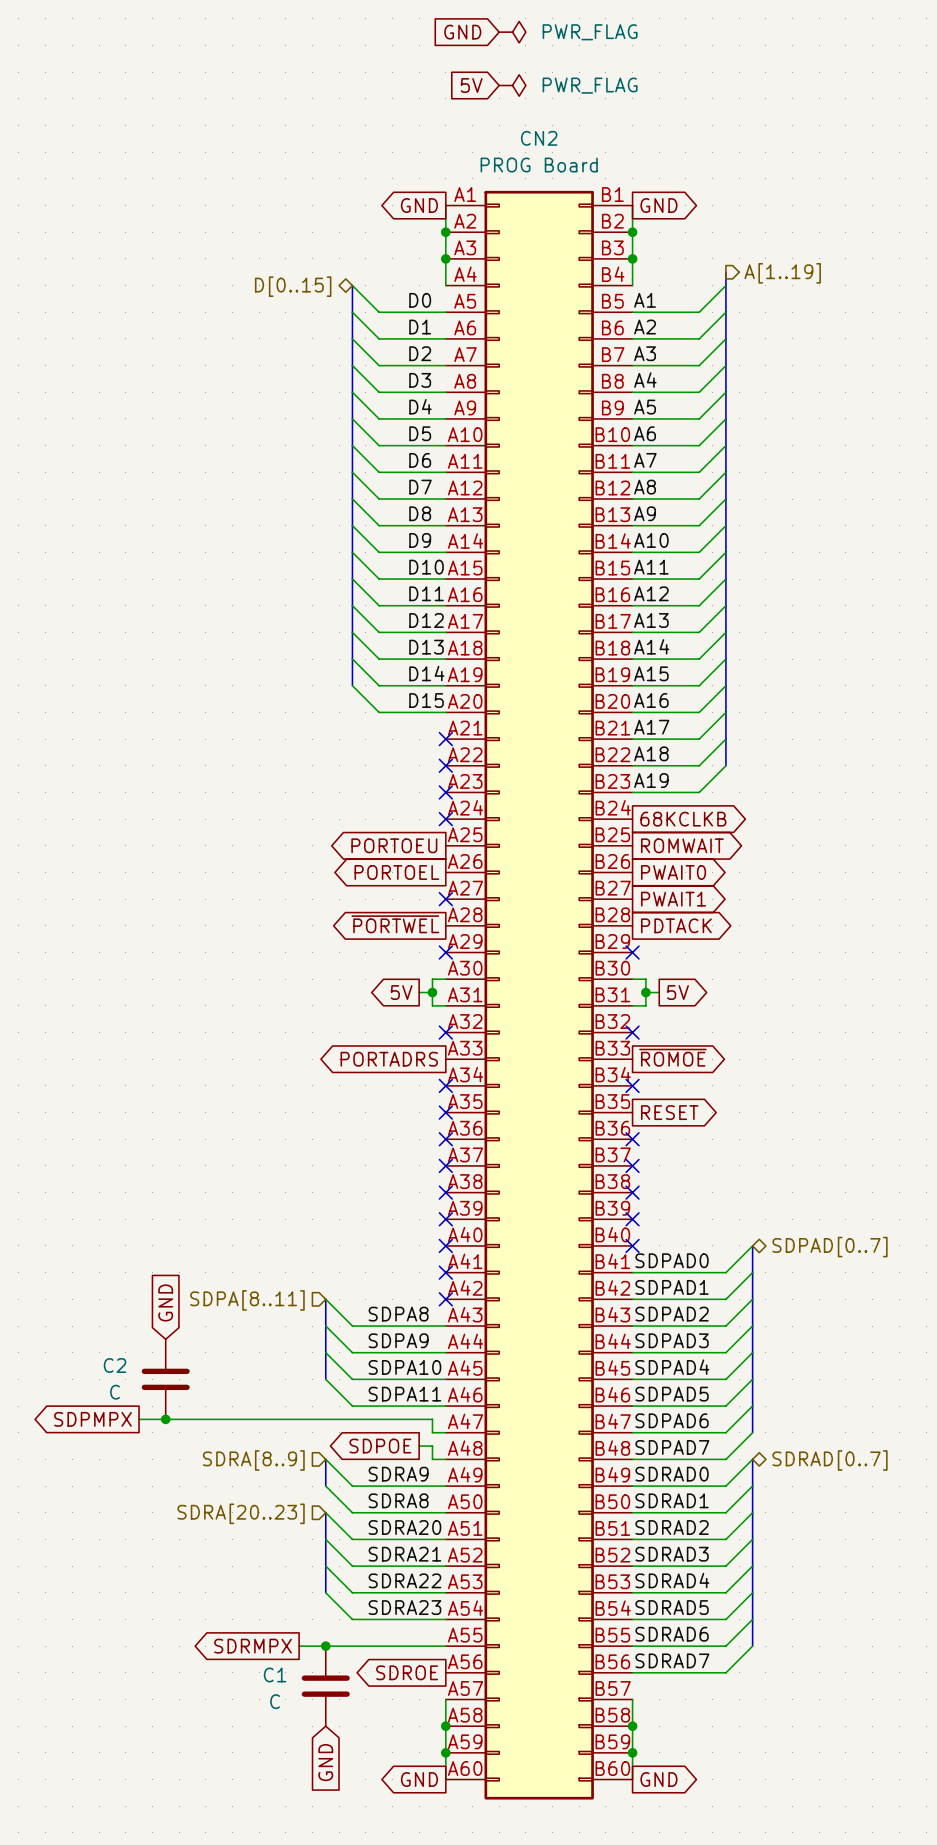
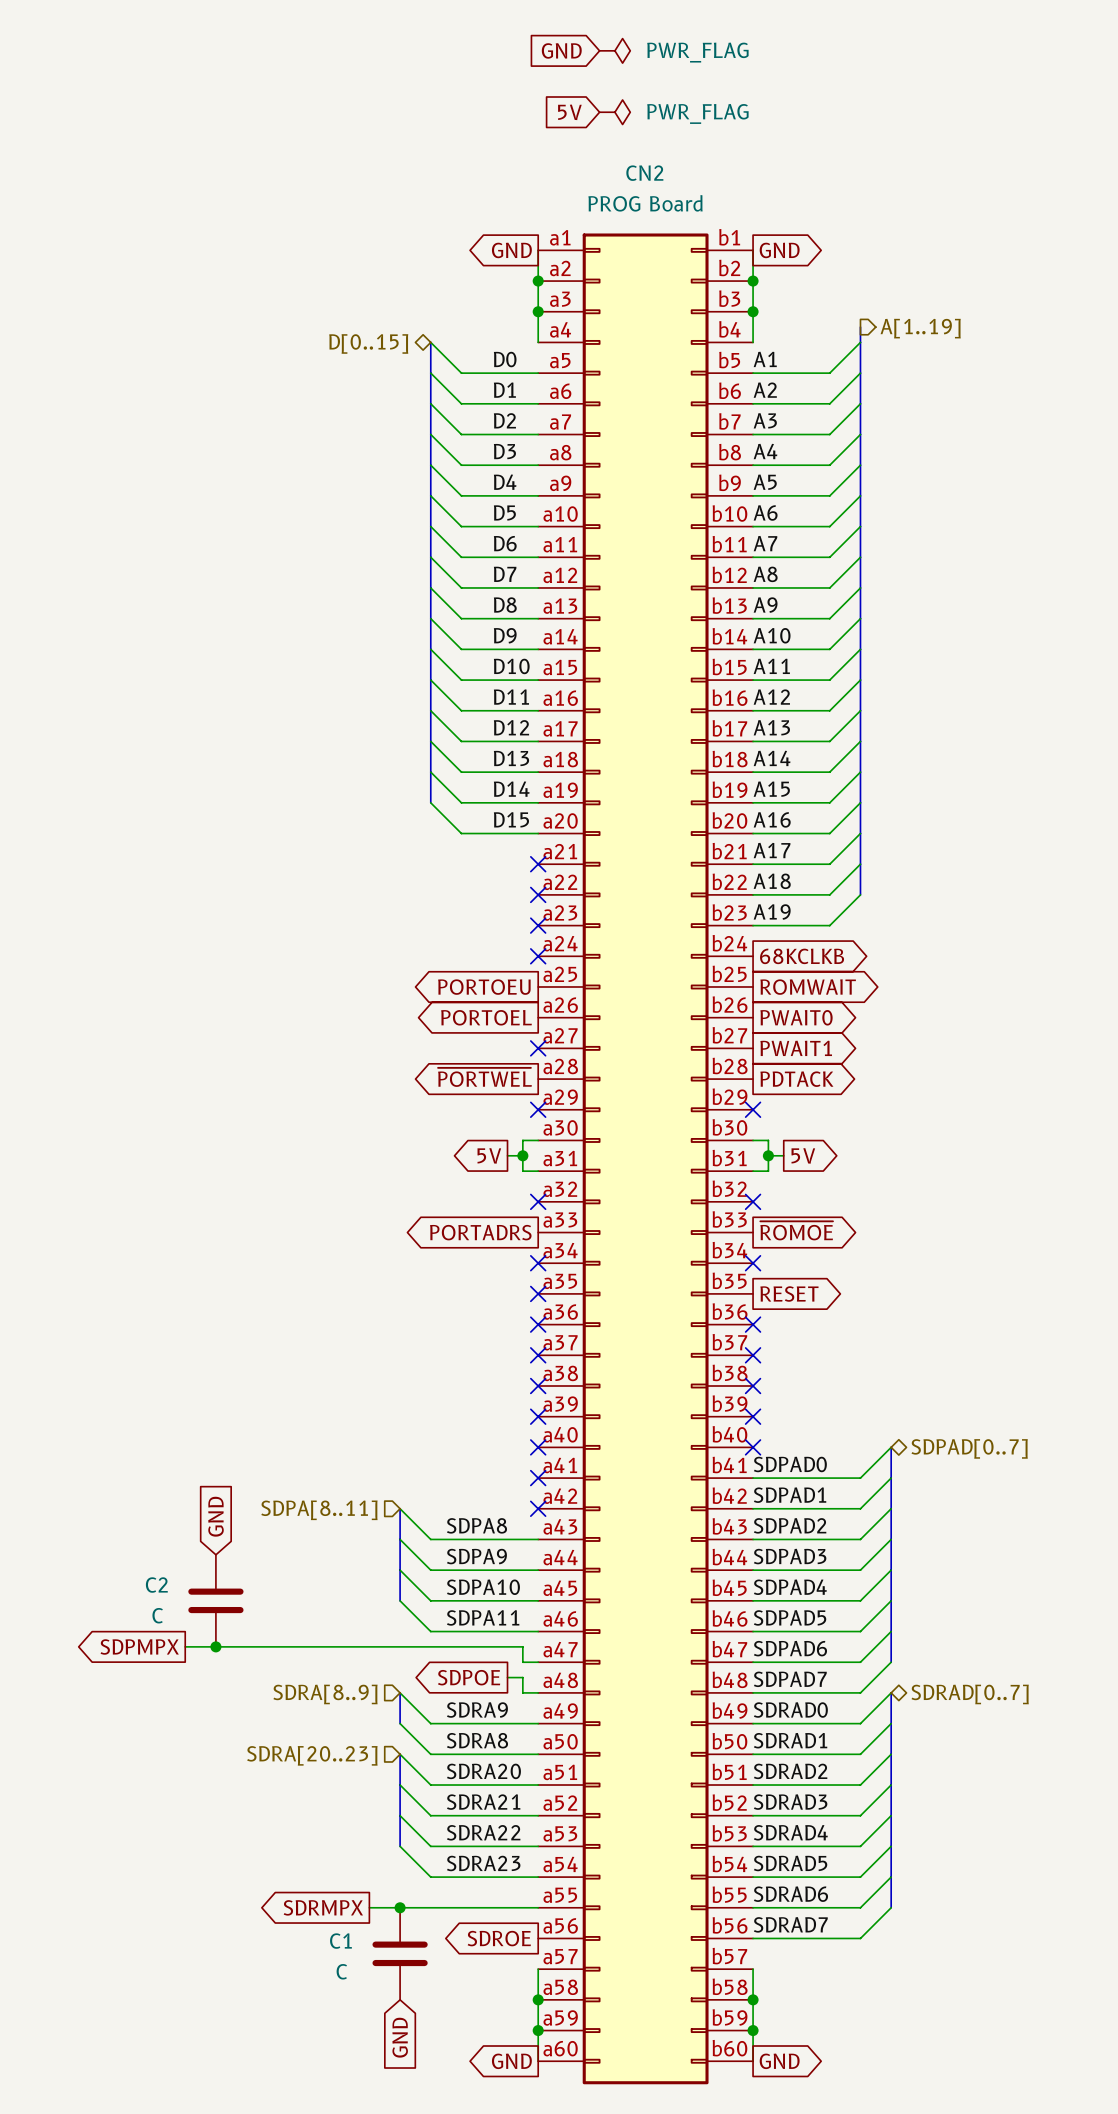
CN2 symbol: [445, 190, 633, 1800] -> [538, 233, 754, 2085]

